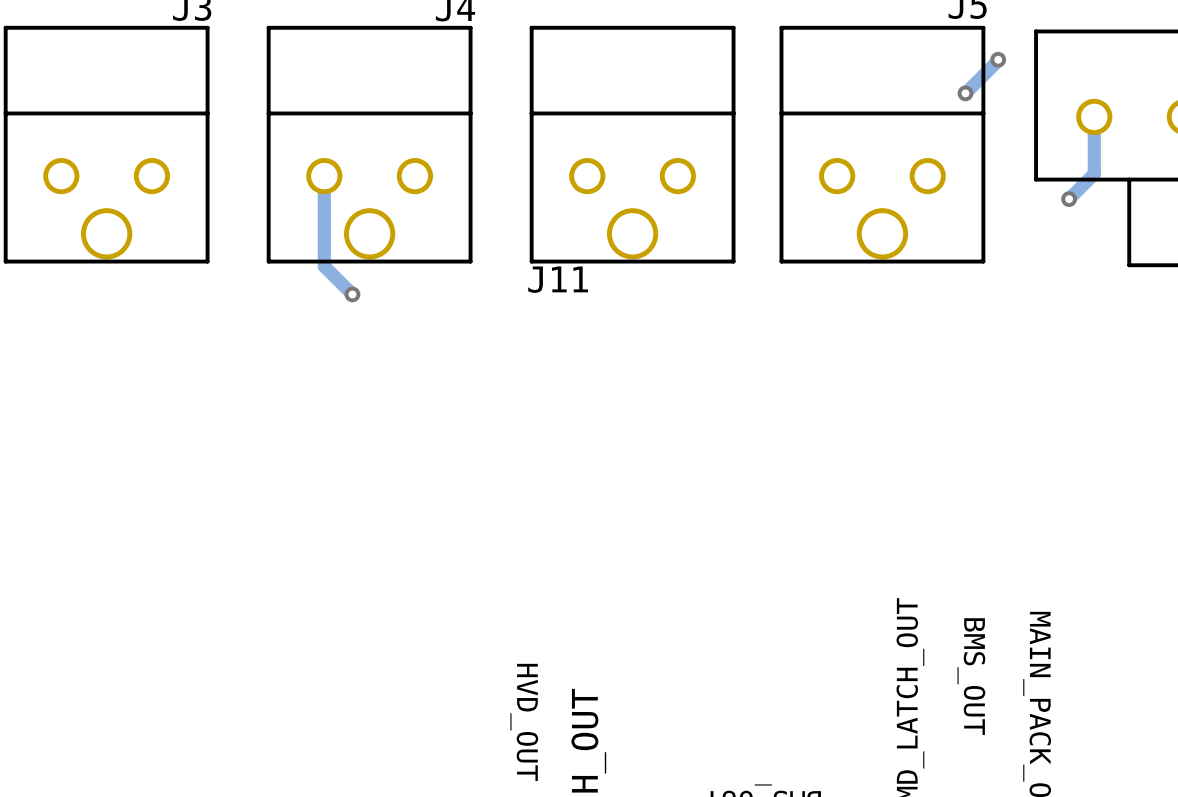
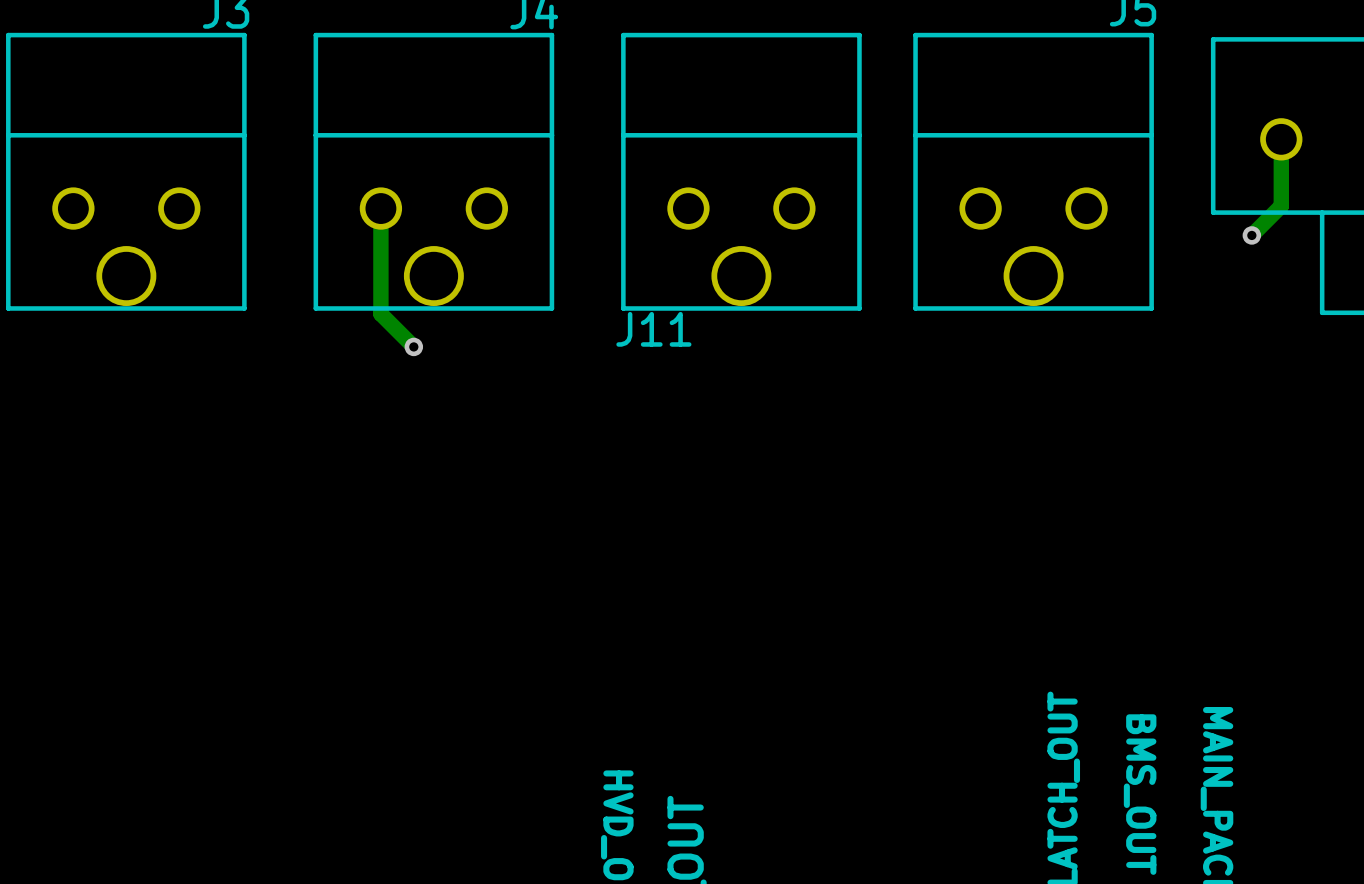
track: (998, 59) (965, 93) -> none
via: (998, 59) -> none
via: (965, 93) -> none

